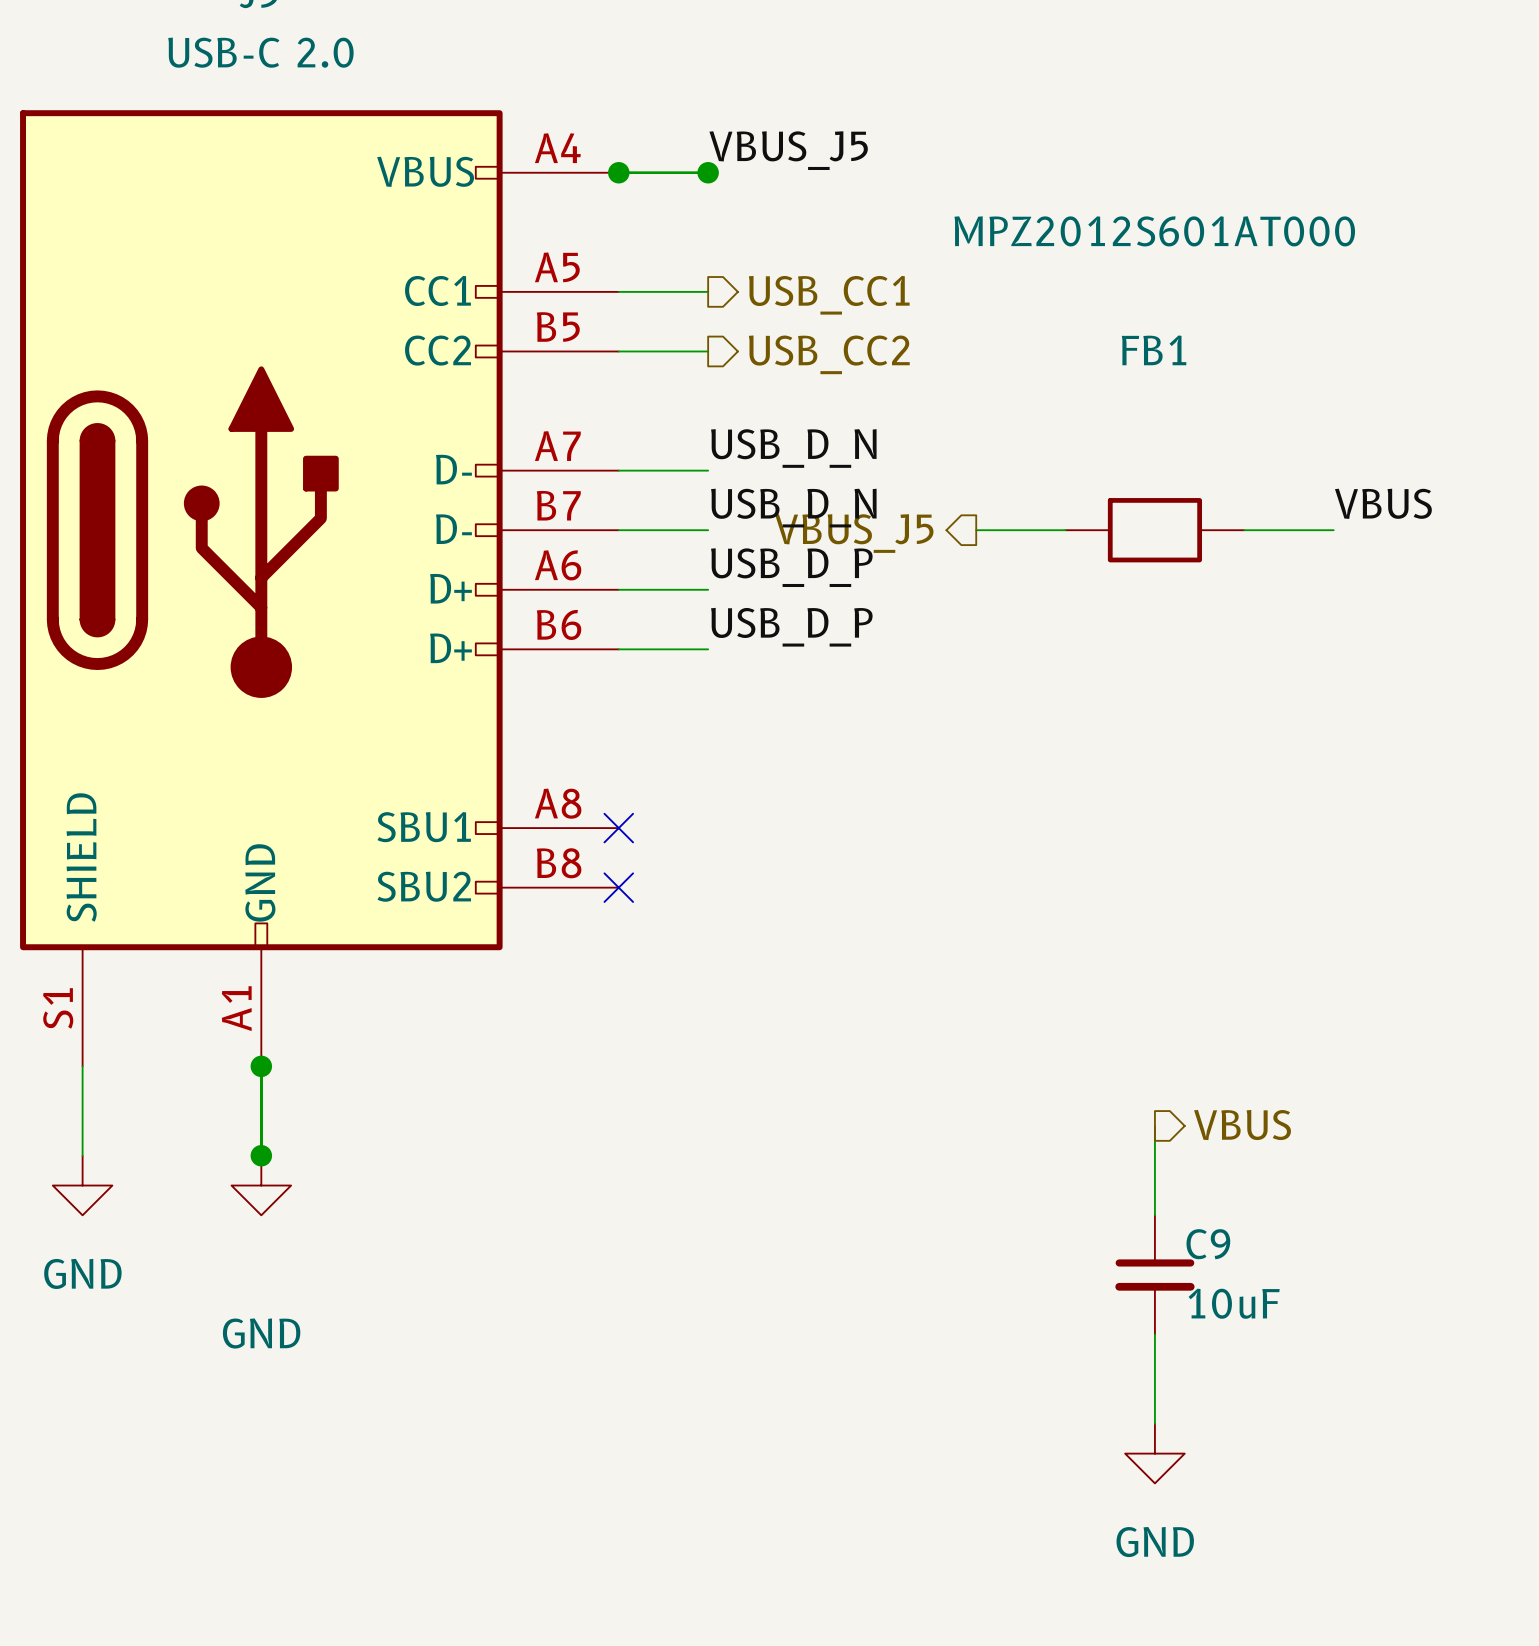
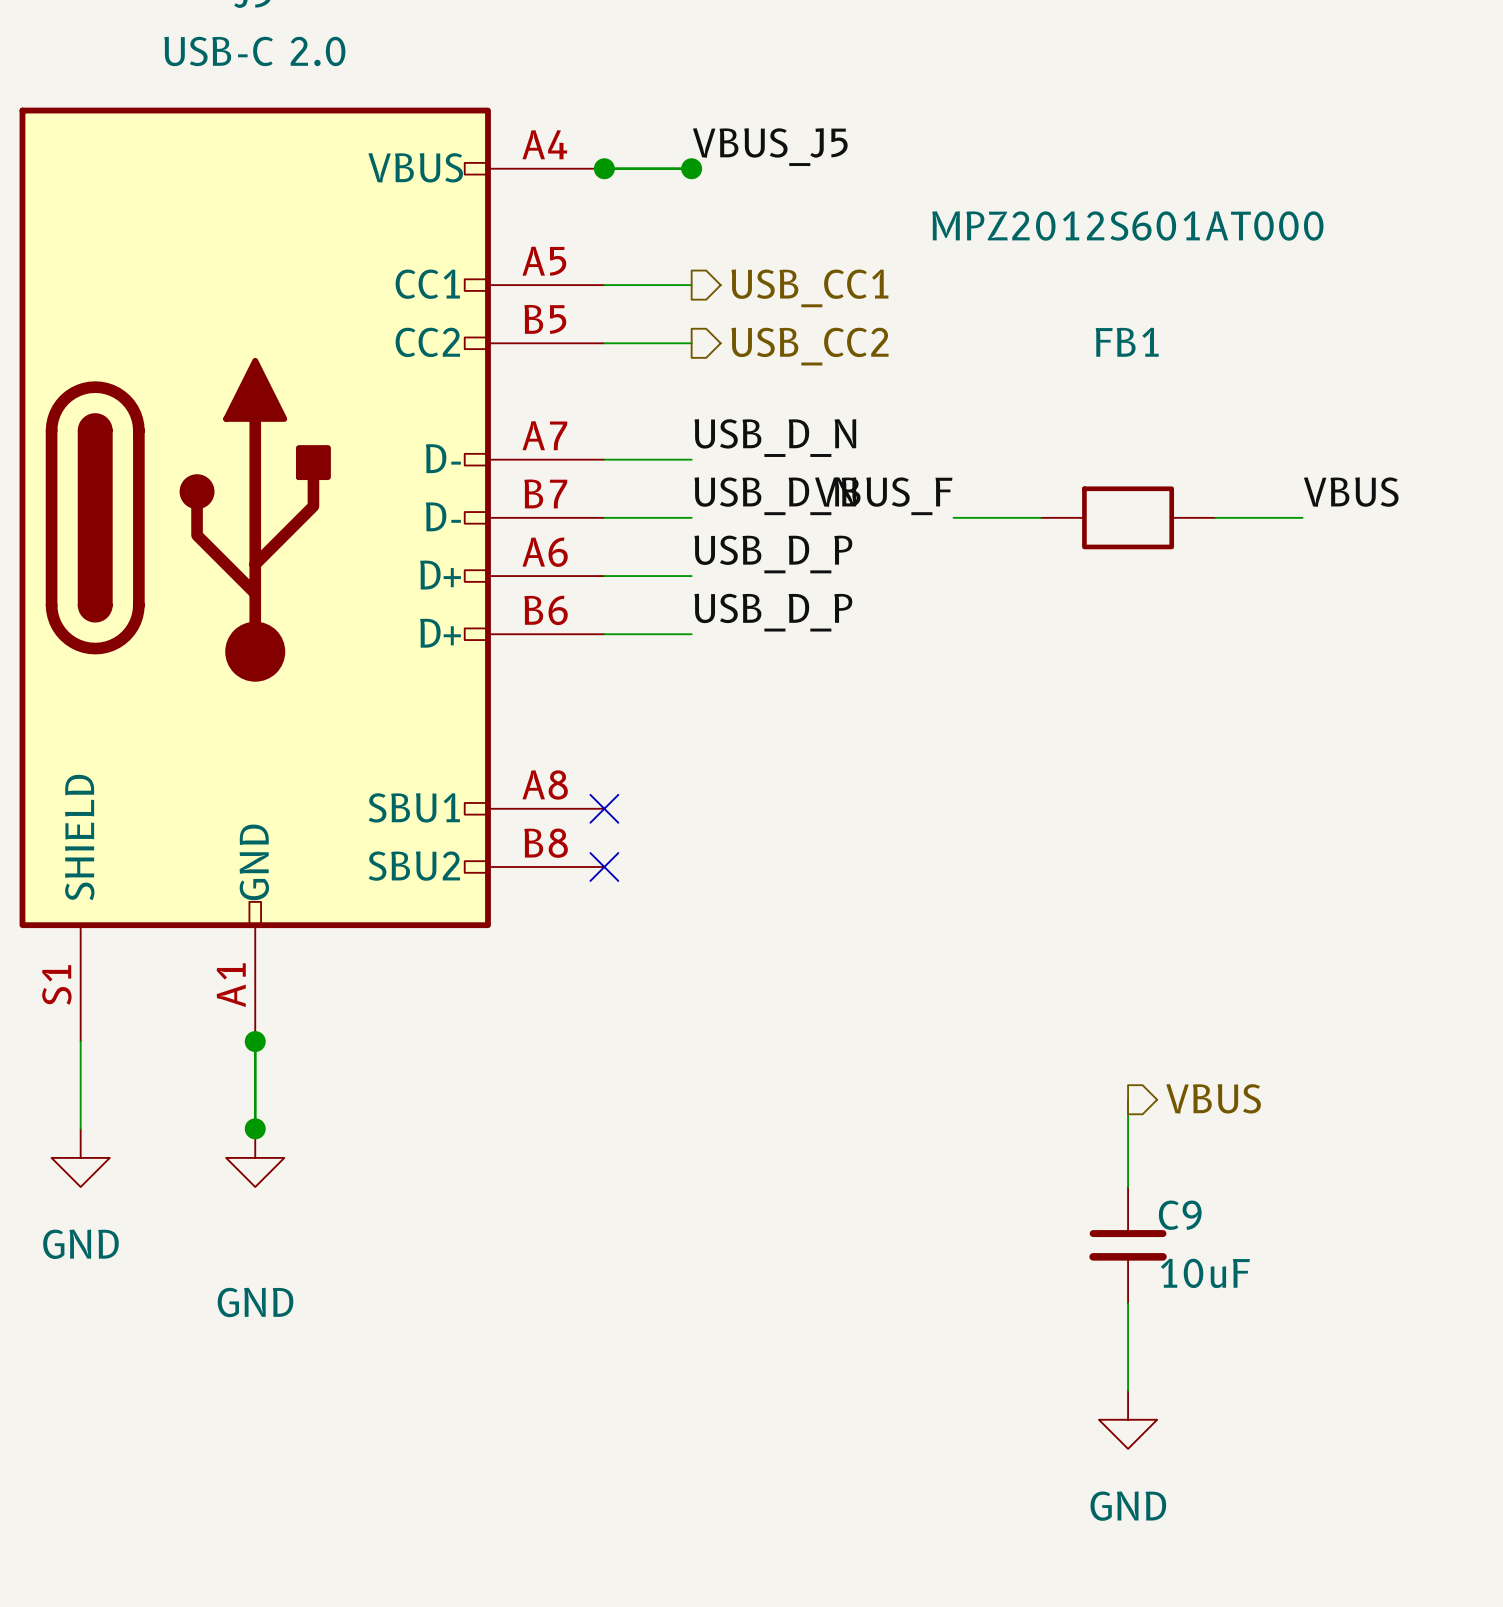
label: none -> VBUS_F (883, 496)
hierarchical label: VBUS_J5 (854, 533) -> none

